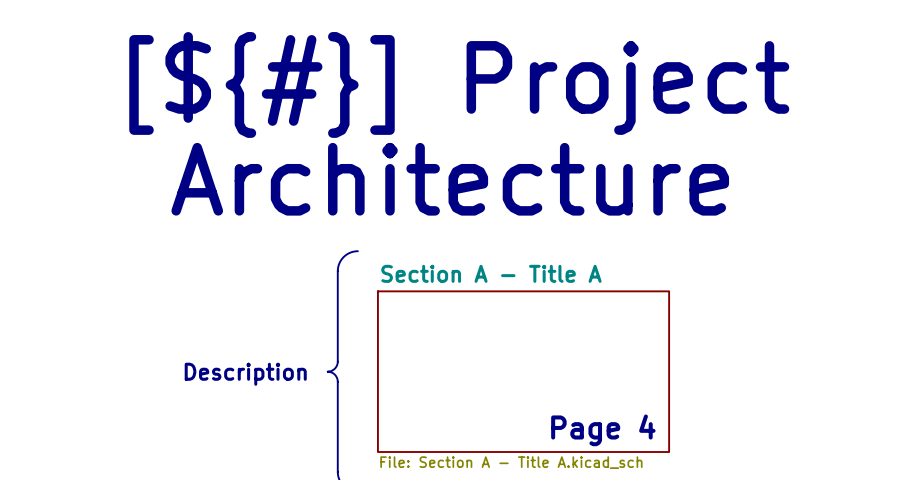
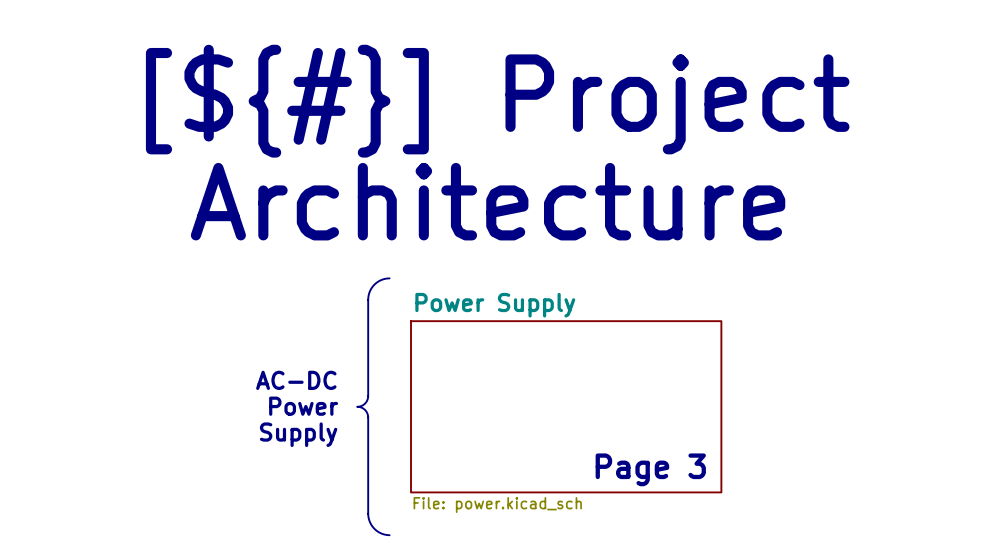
sheet Section A - Title A name: Section A - Title A (491, 273) -> Power Supply (495, 305)
text: none -> AC-DC (296, 380)
text: none -> Power (303, 406)
text: Description (245, 374) -> none
text: none -> Supply (298, 434)
text: Page 4 (603, 430) -> Page 3 (650, 469)
sheet Section A - Title A value: File: Section A - Title A.kicad_sch (511, 462) -> File: power.kicad_sch (497, 504)

